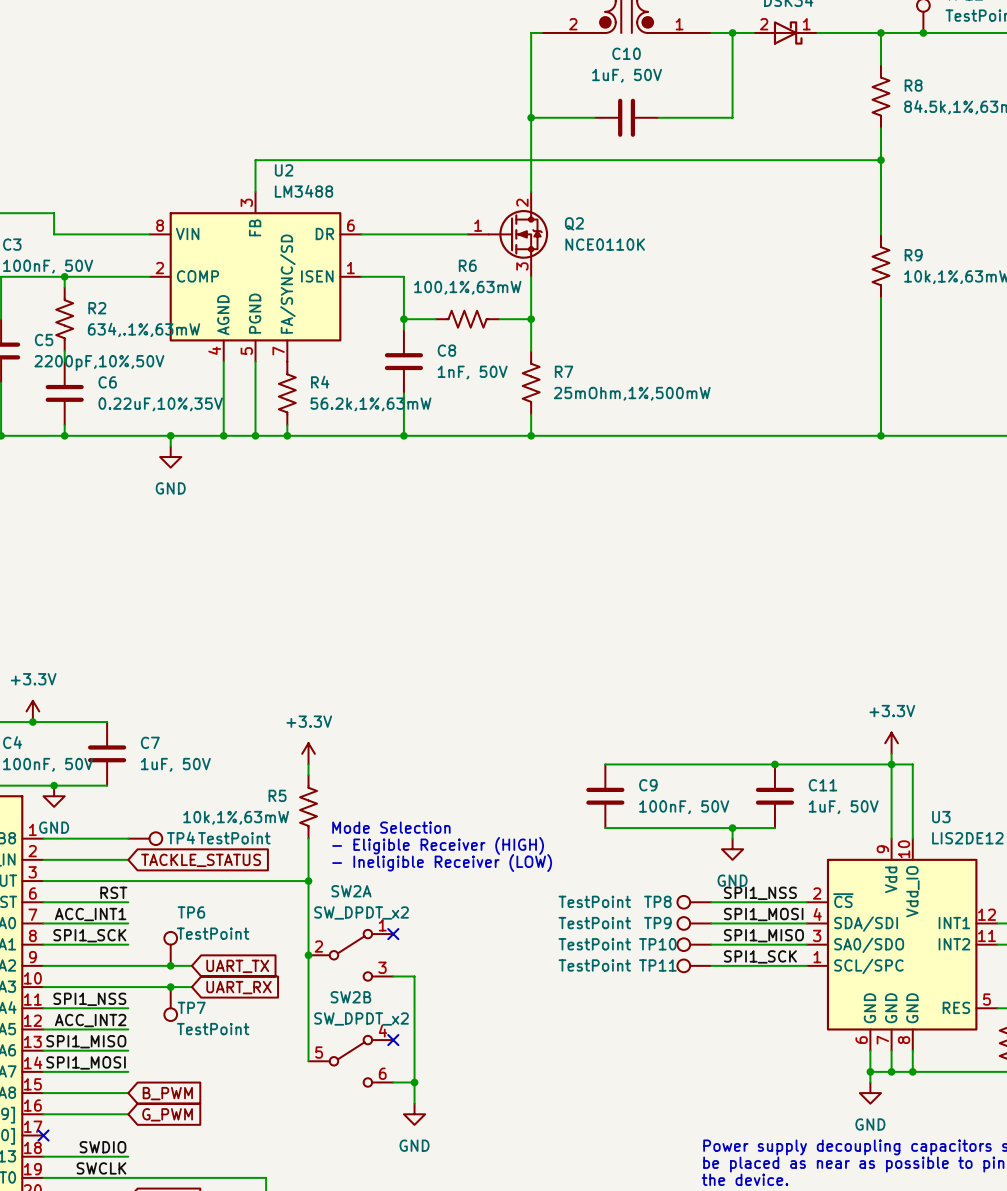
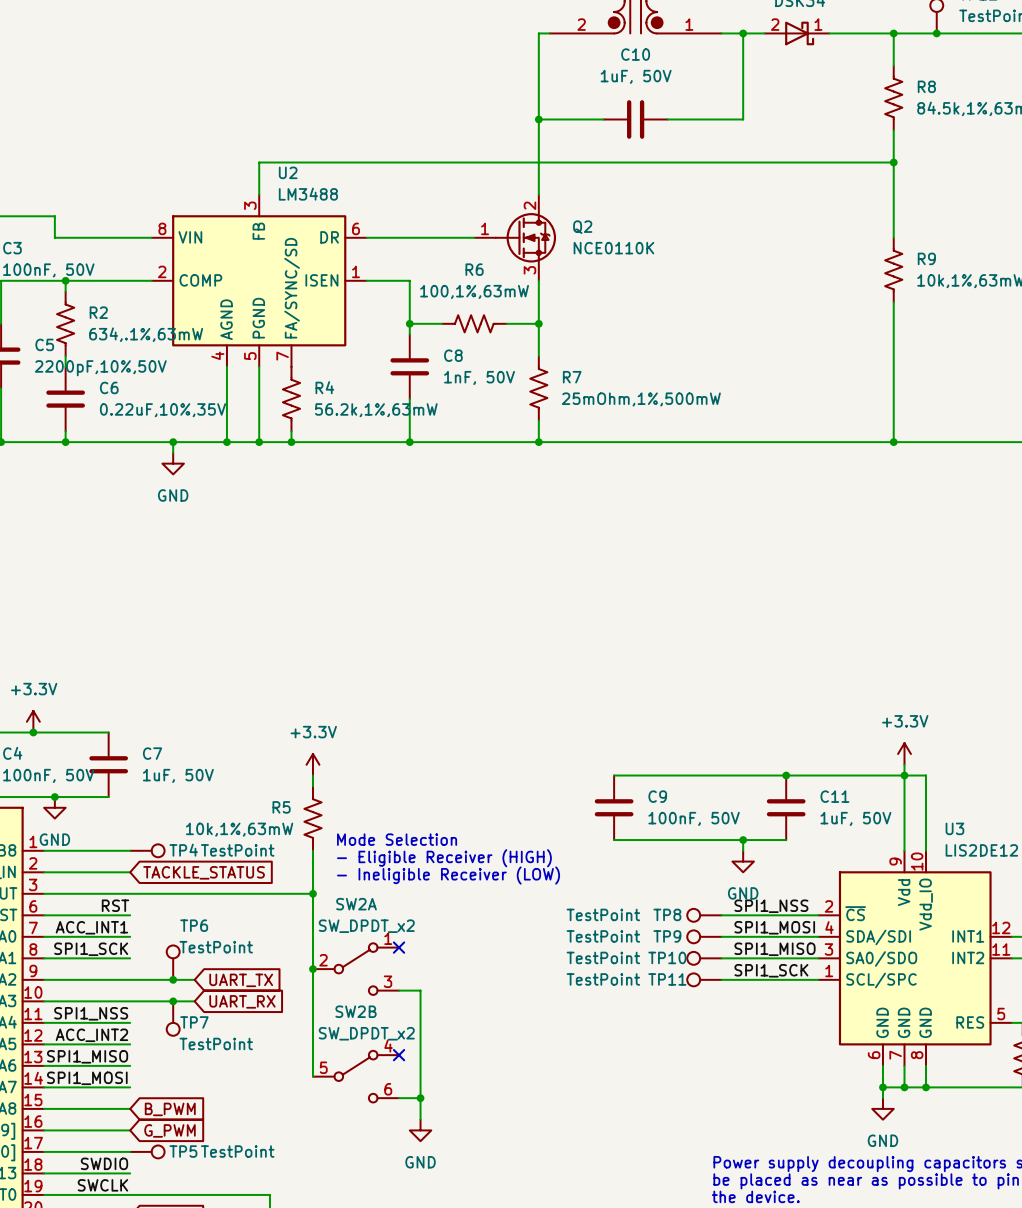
wire: none -> (44, 1151) (130, 1151)
no-connect mark: (43, 1135) -> none
TP5: none -> TestPoint (147, 1151)

